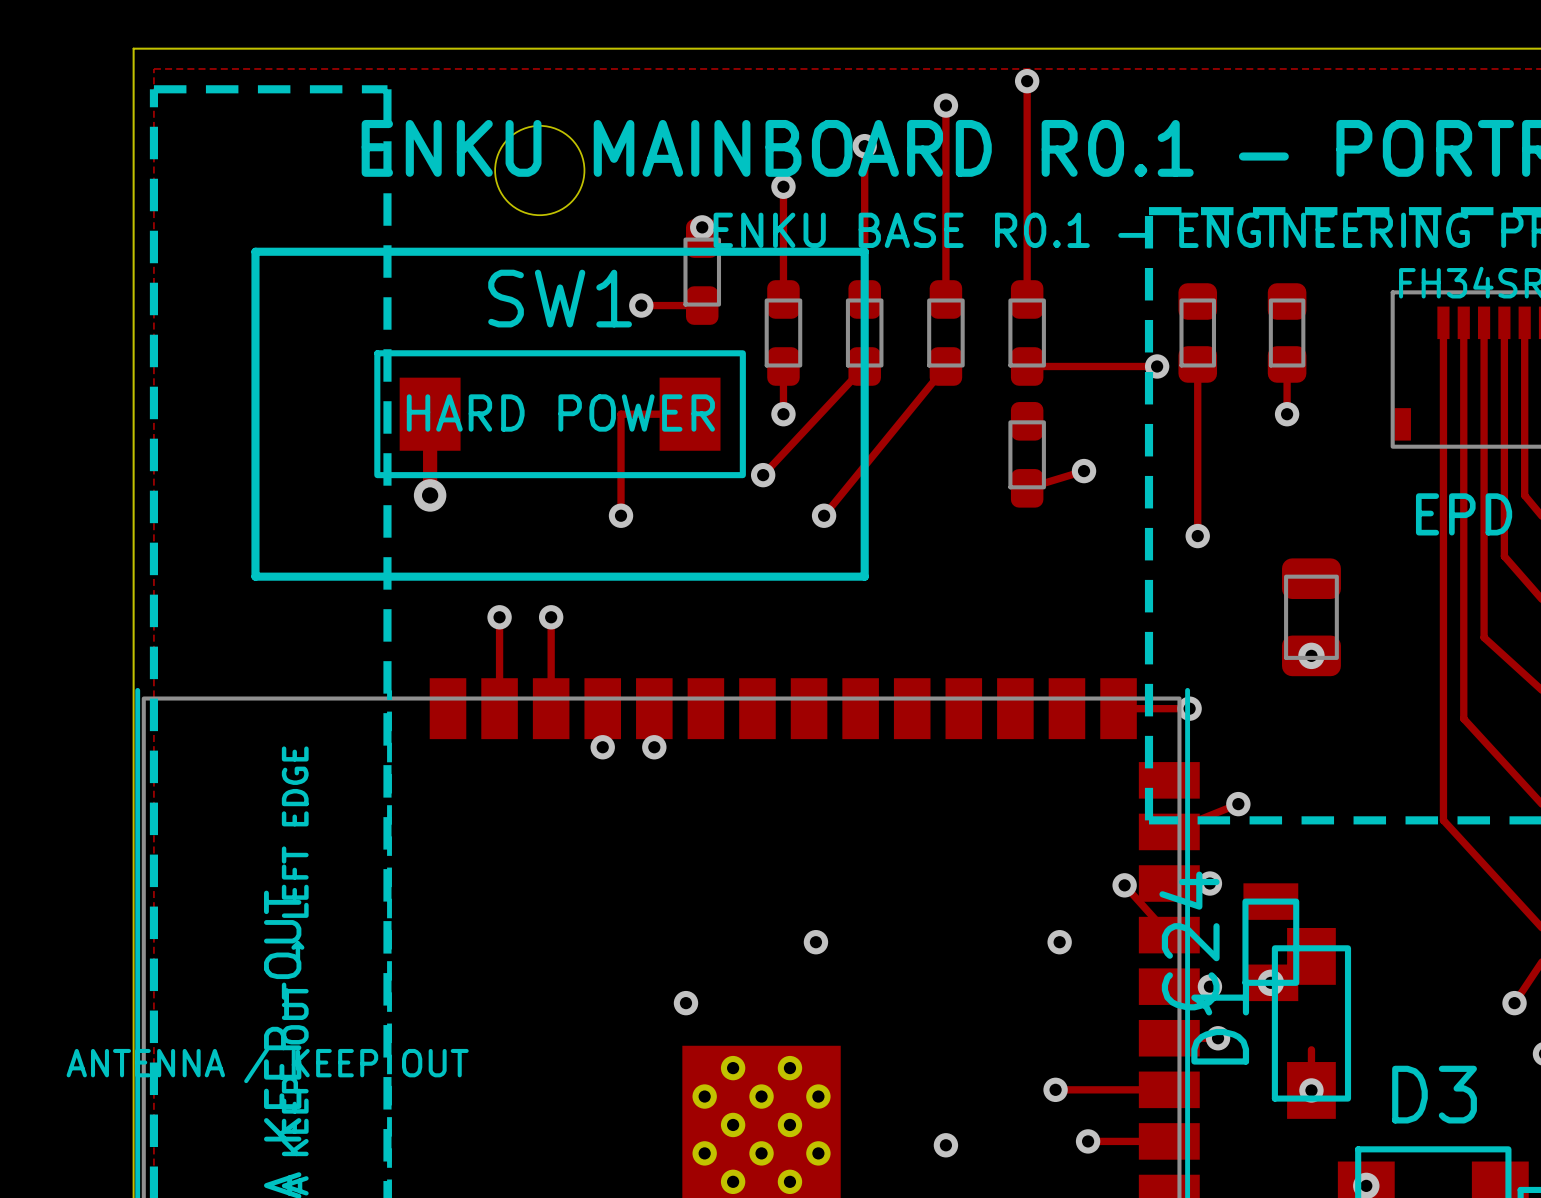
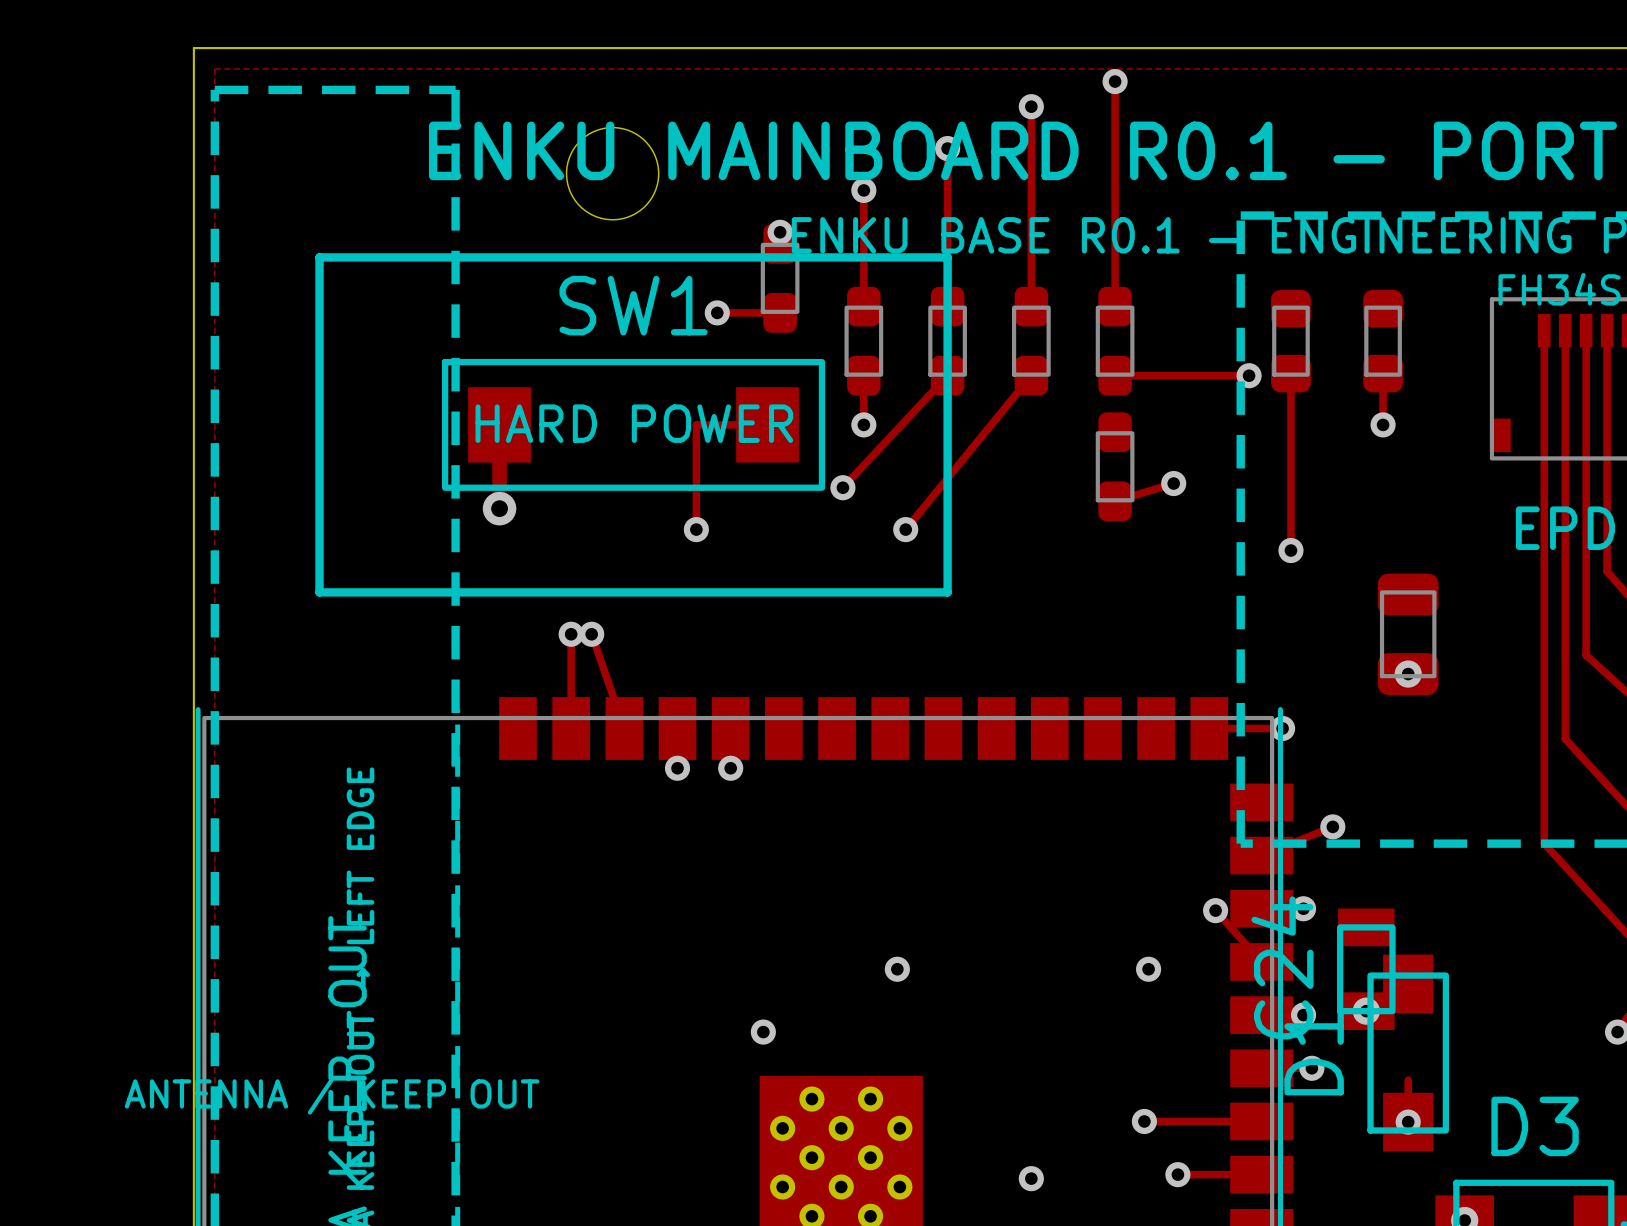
track: (551, 617) (551, 708) -> (591, 634) (624, 728)
via position: (551, 617) -> (591, 634)

